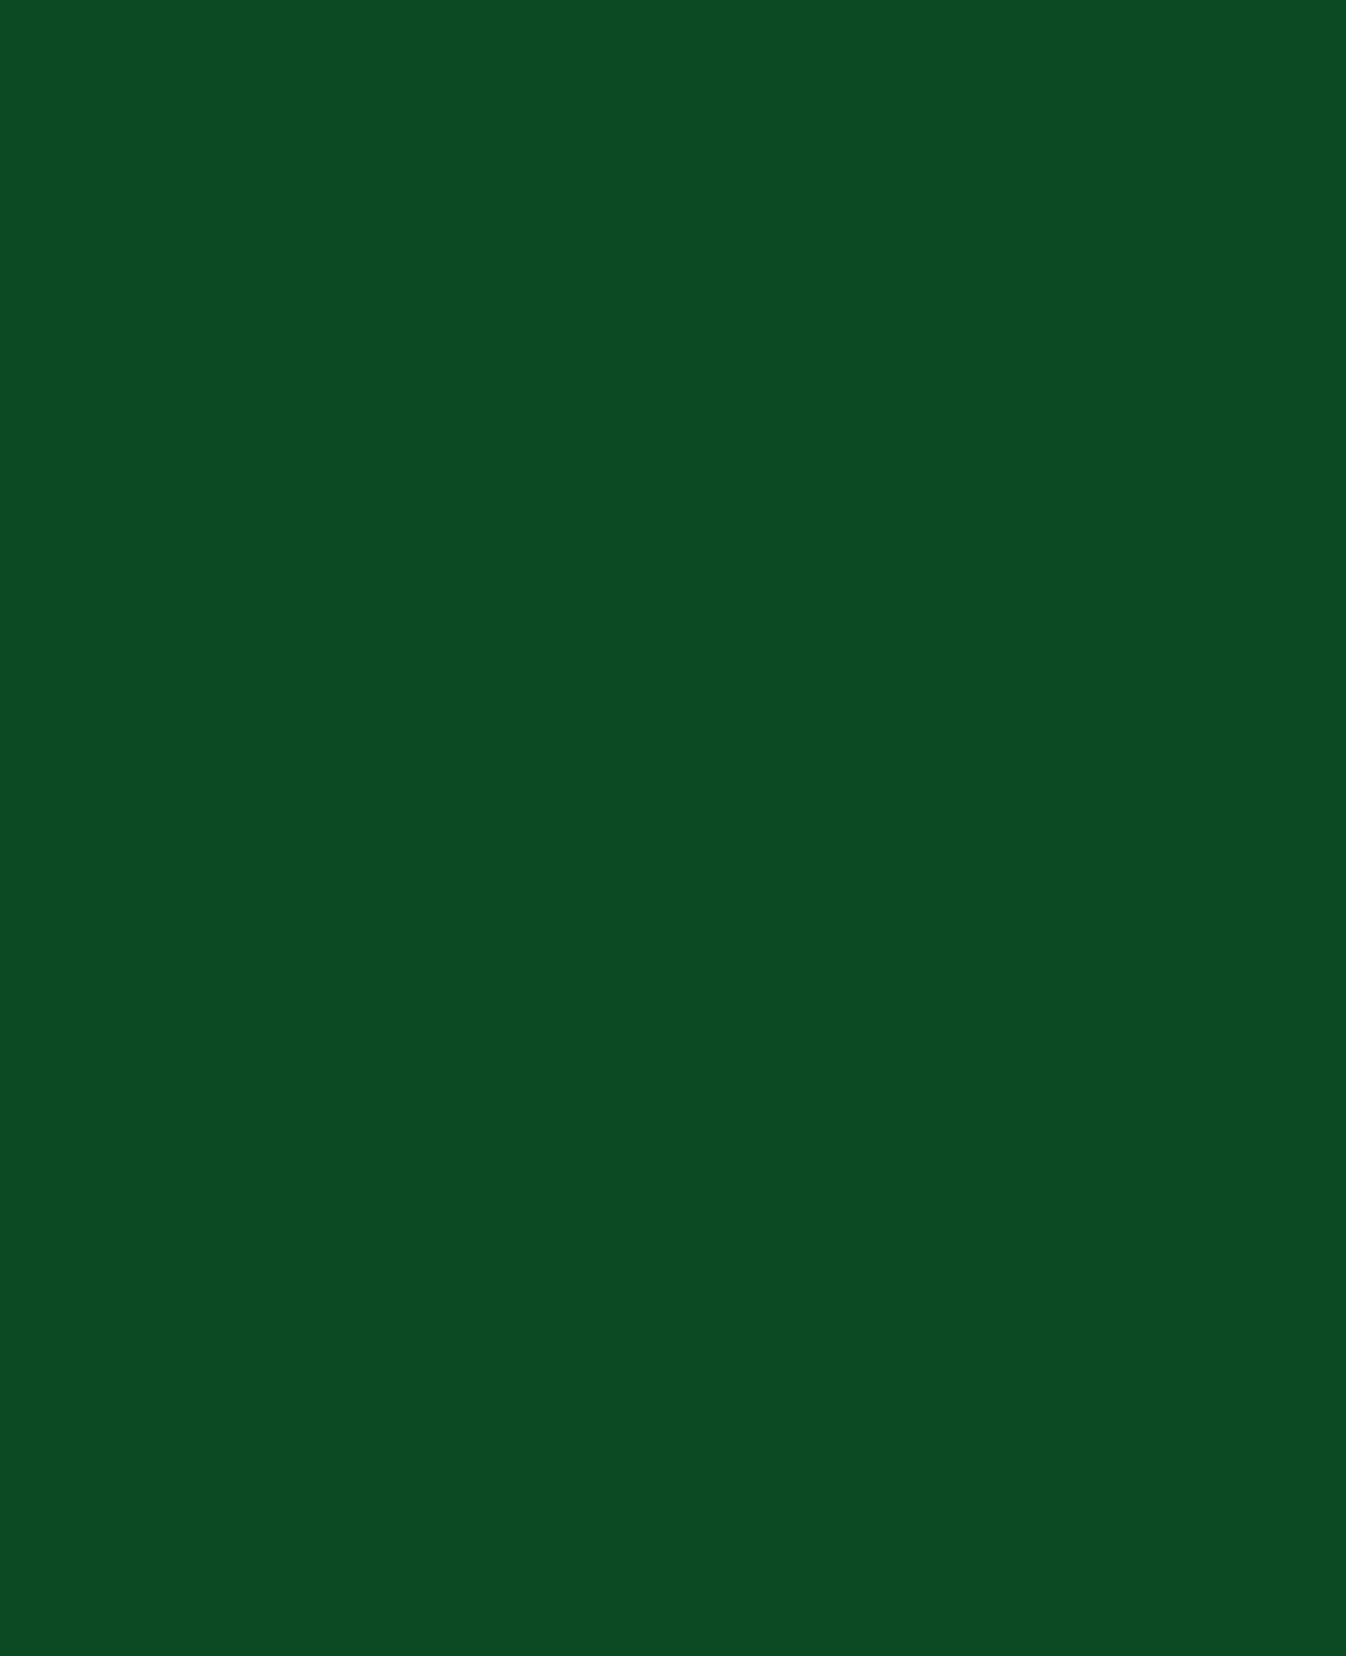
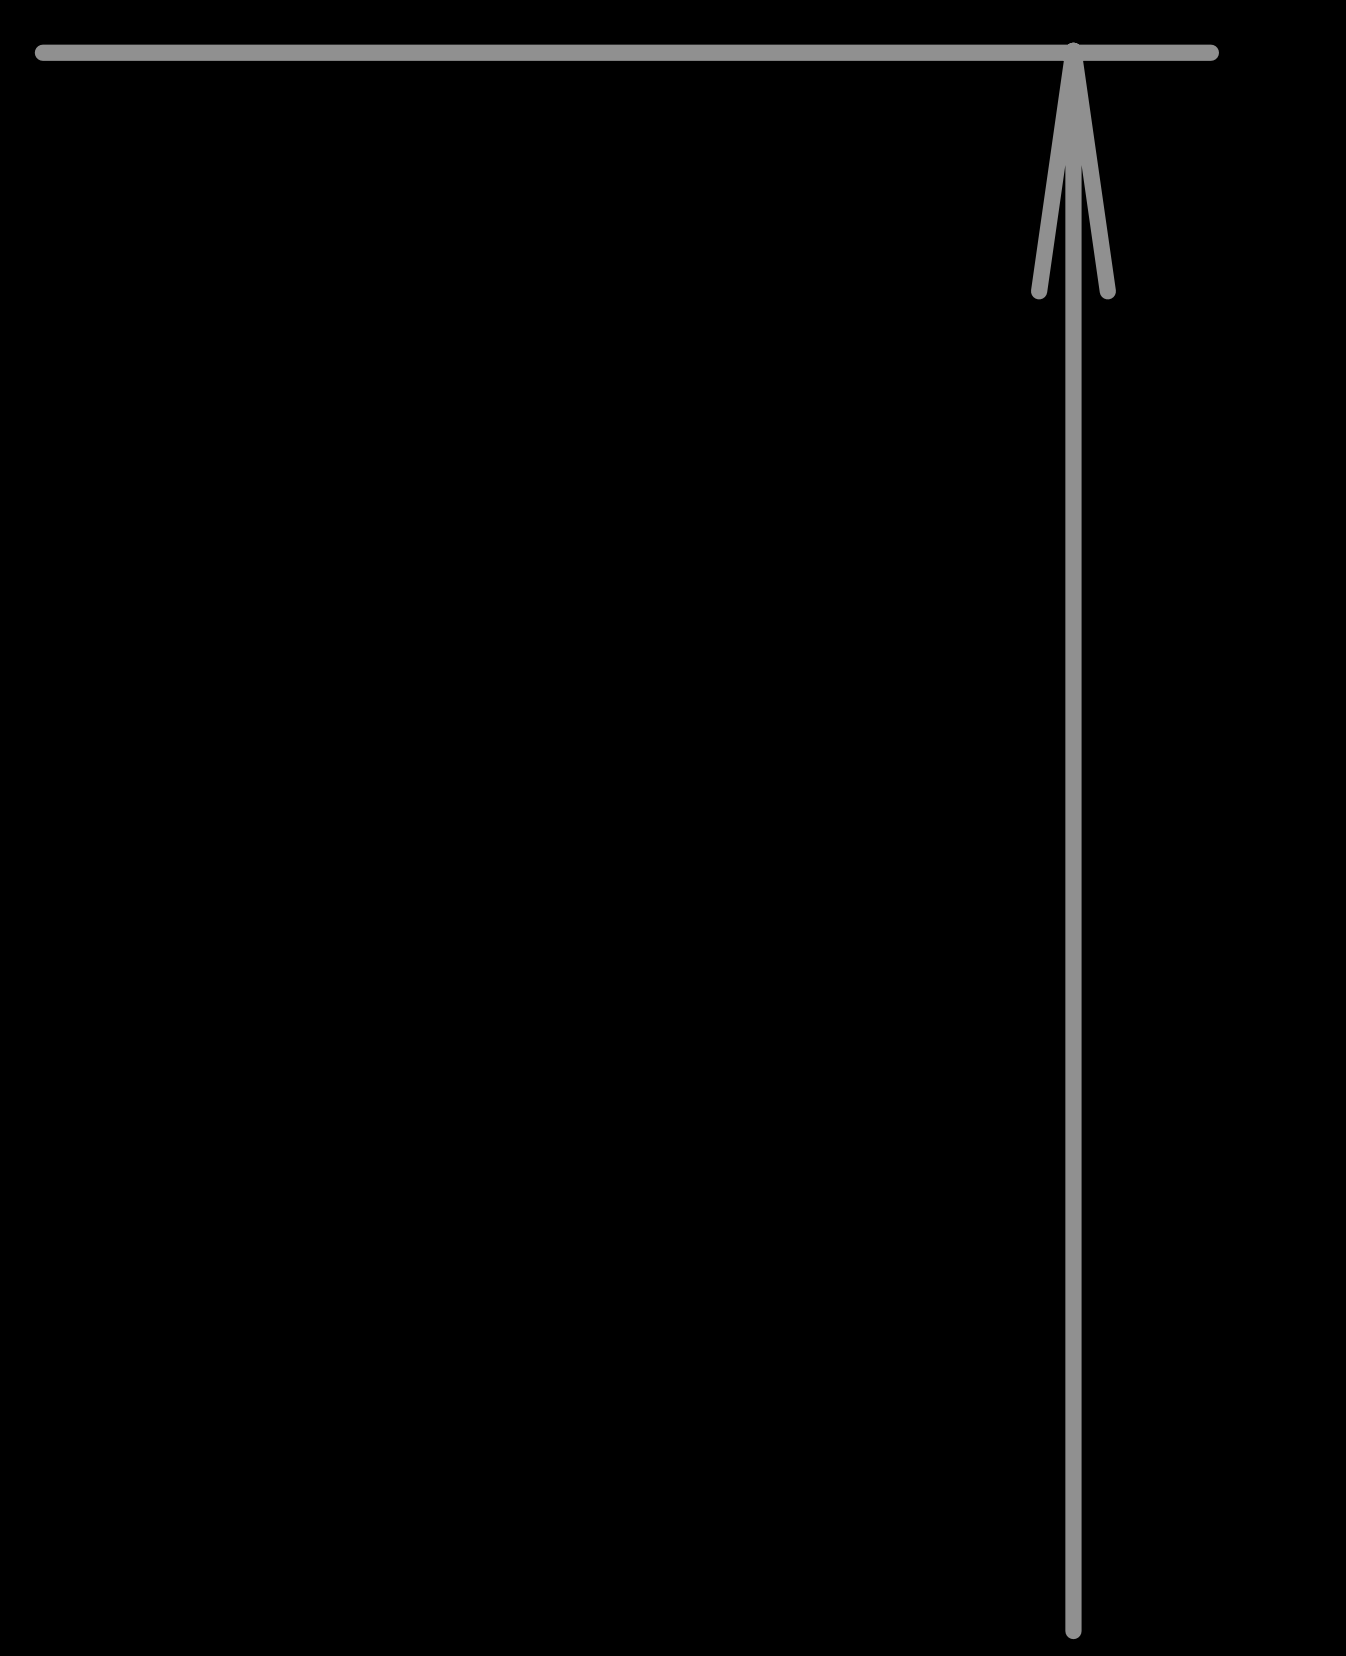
line: none -> (1073, 50) (1039, 291)
line: none -> (1073, 50) (1107, 291)
line: none -> (1073, 50) (1073, 1631)
line: none -> (1210, 52) (42, 52)

